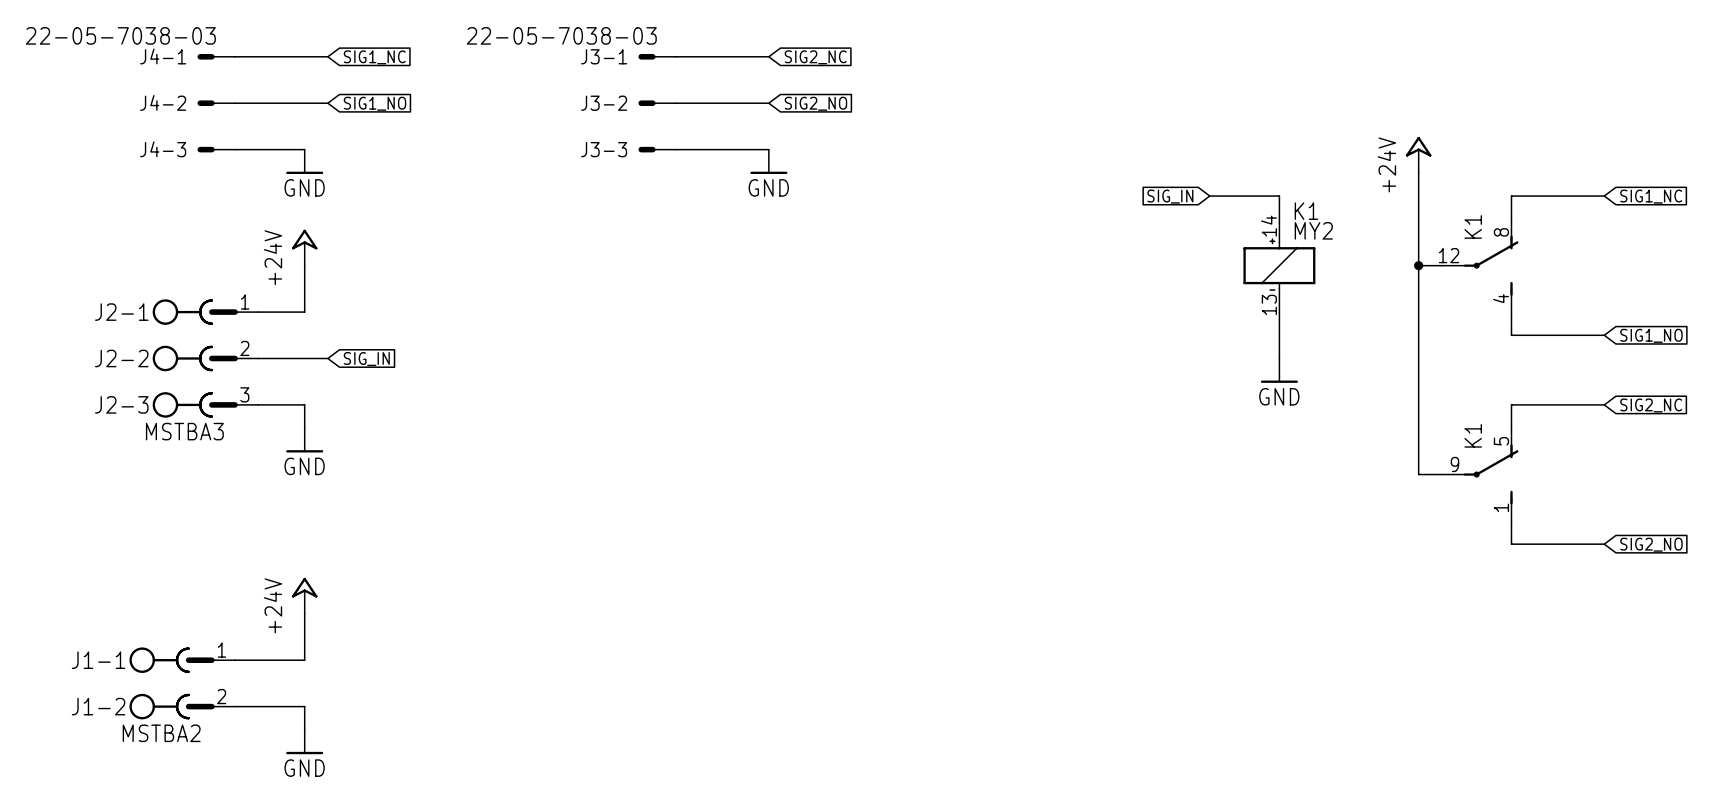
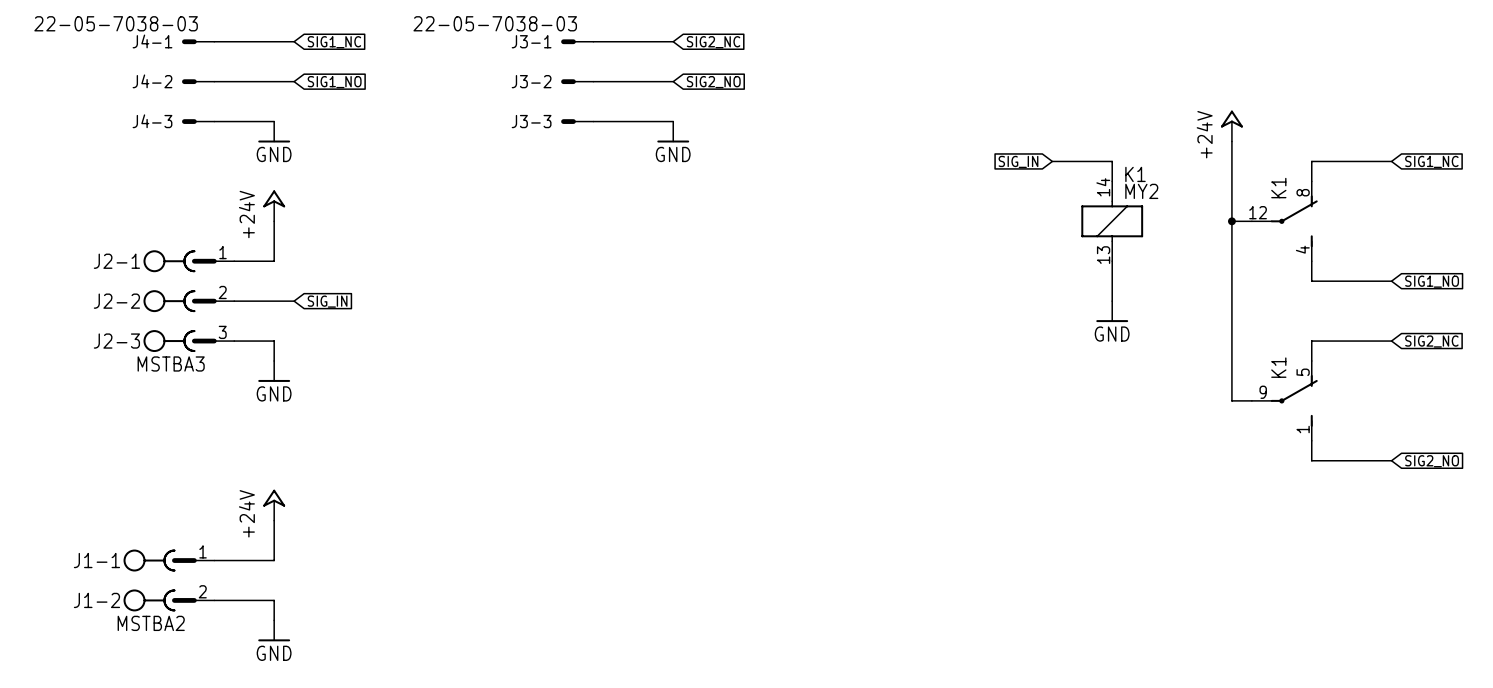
K1 symbol: [1243, 219, 1316, 313] -> [1081, 181, 1144, 262]

